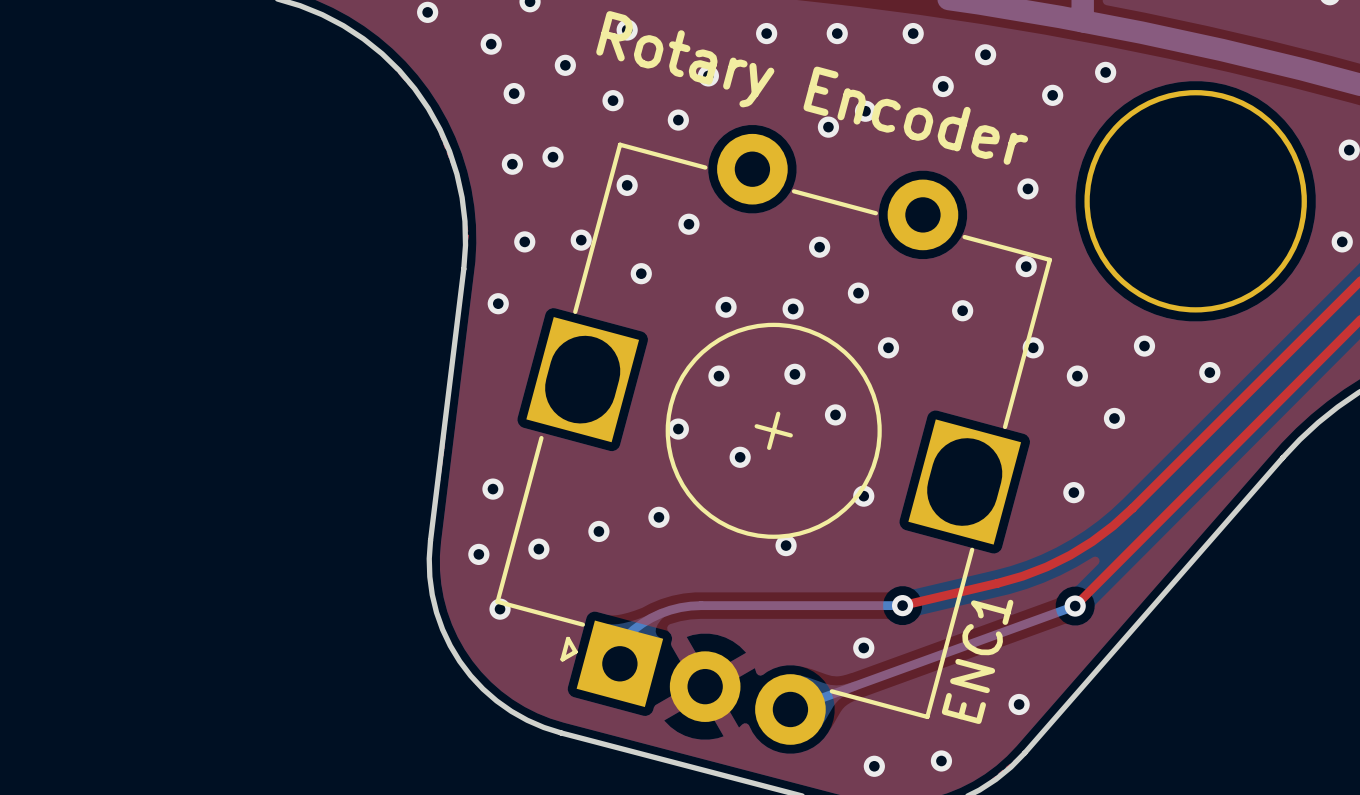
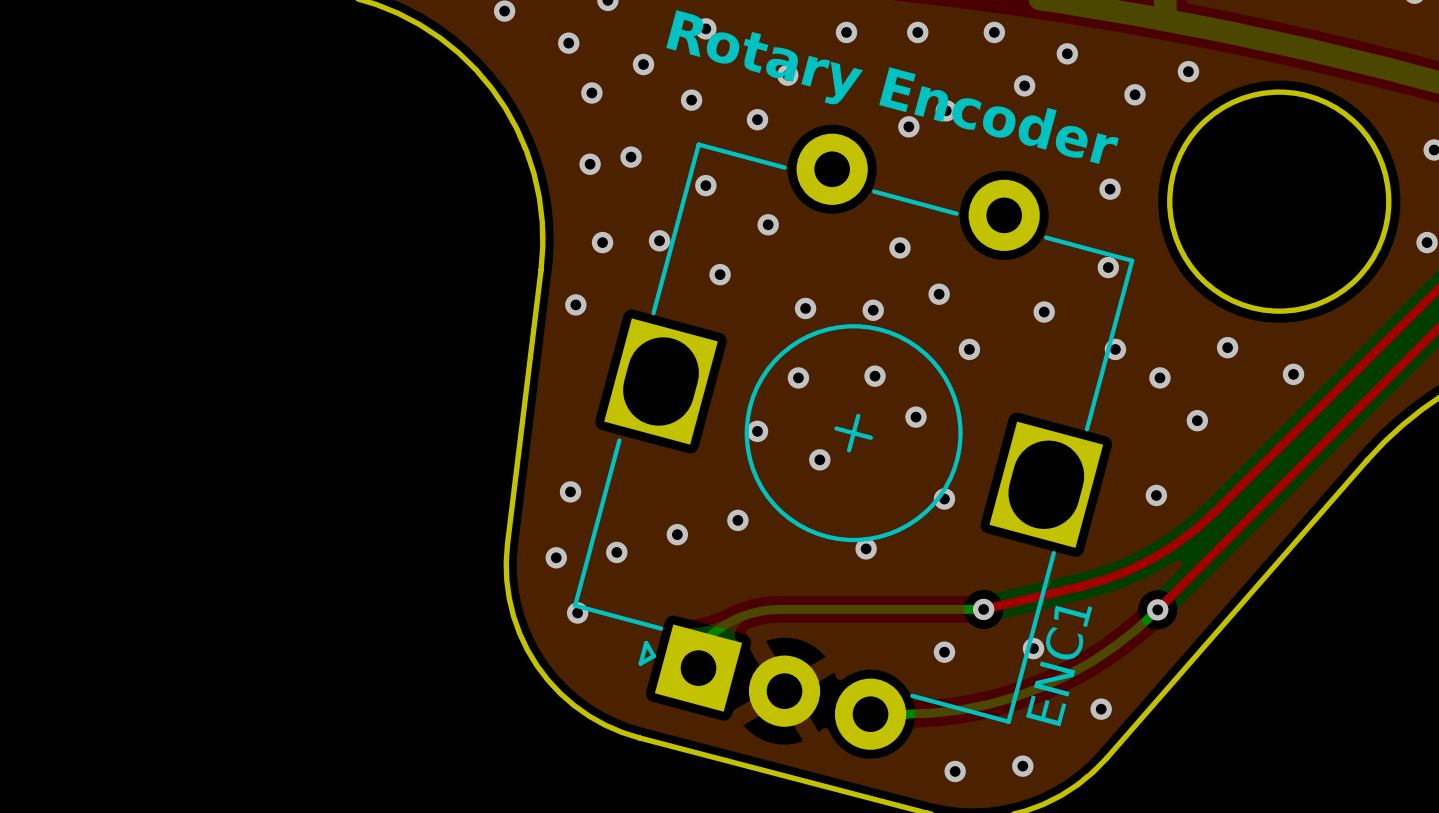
bottom track: (1075, 606) (790, 709) -> (1157, 609) (1115, 646) (1091, 661) (1067, 675) (1015, 696) (961, 709) (933, 713) (870, 714)
via: none -> (1033, 648)

